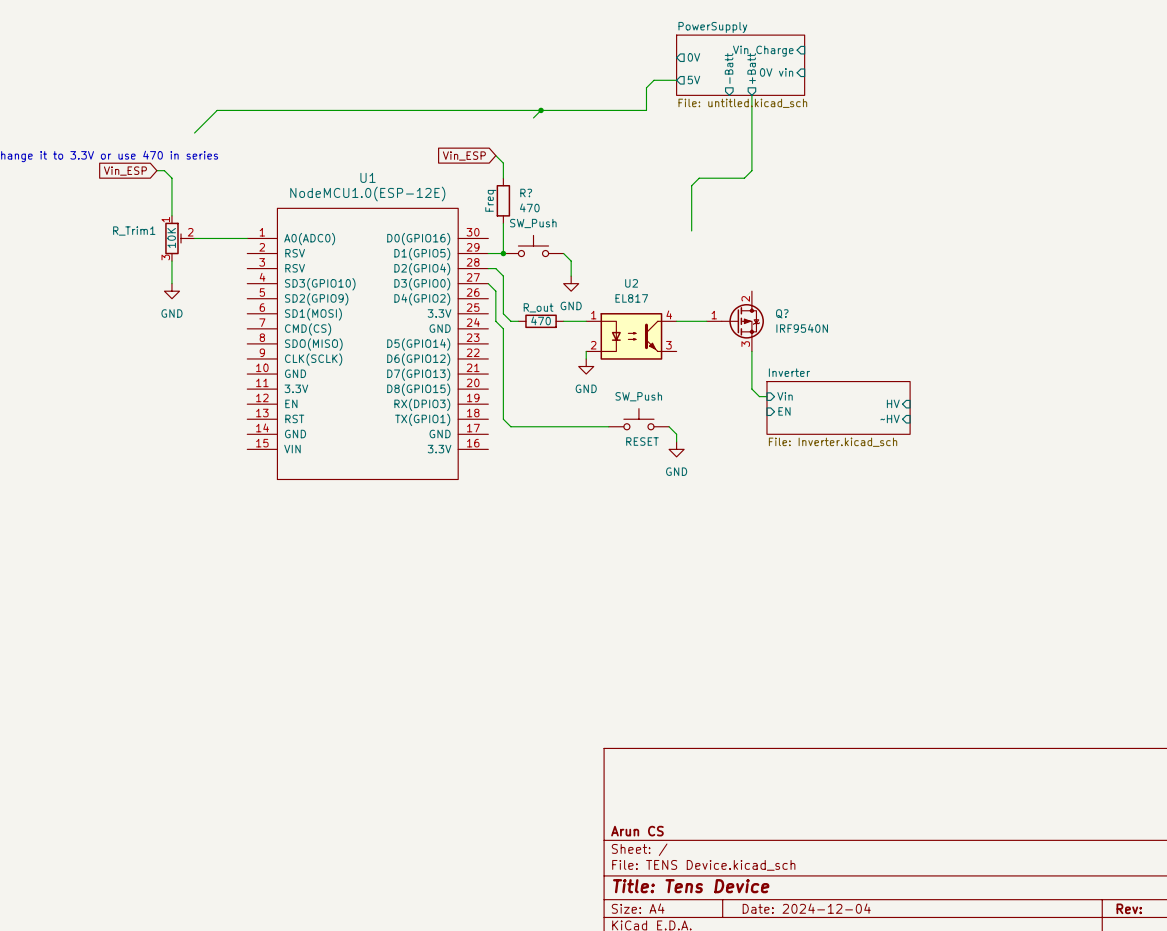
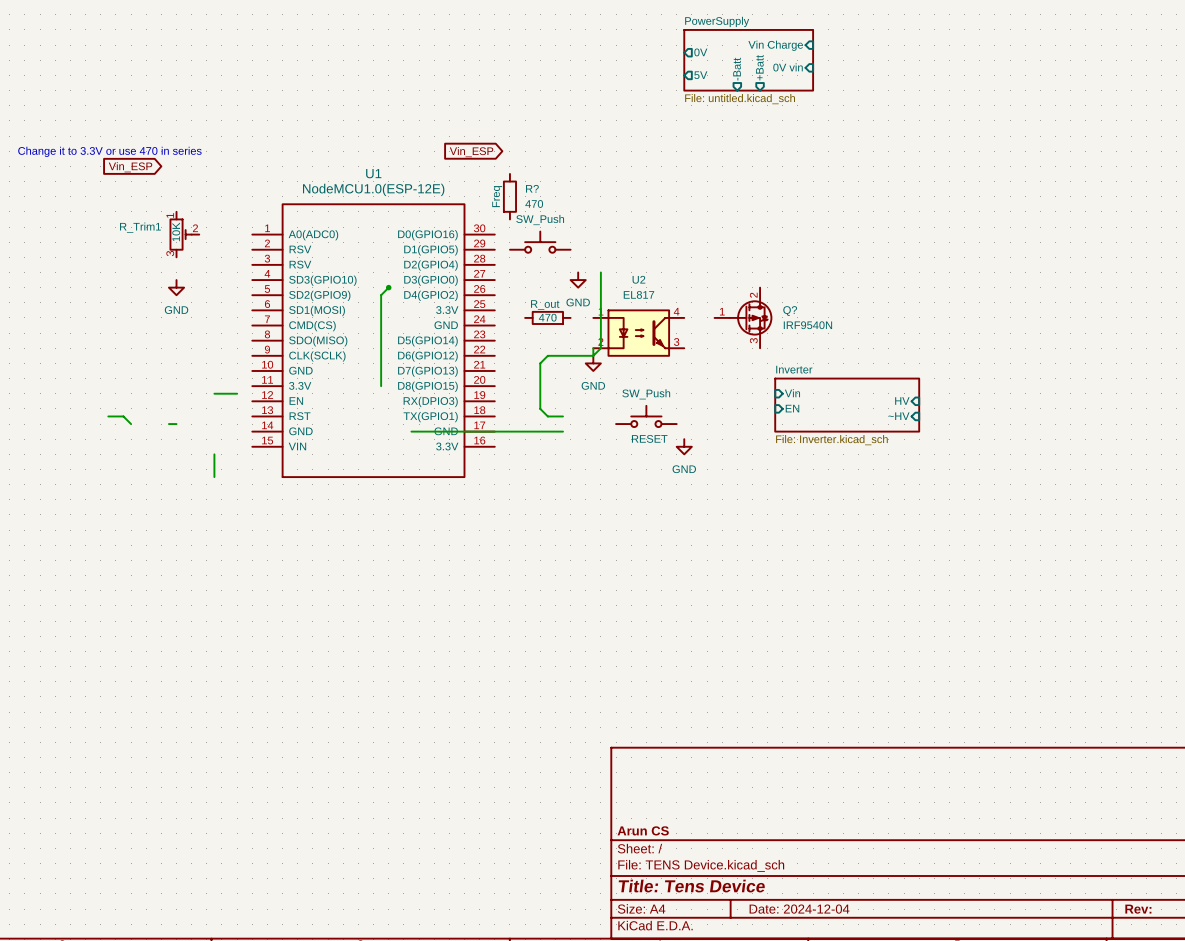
wire: (676, 80) (654, 80) (646, 87) (646, 110) (217, 110) (194, 133) -> none
wire: (751, 95) (751, 170) (744, 178) (699, 178) (691, 185) (691, 230) -> none
wire: (541, 110) (533, 117) -> none
junction: (541, 110) -> none
wire: (495, 155) (503, 163) (503, 178) -> none
wire: (156, 170) (164, 170) (171, 178) (171, 215) -> none
wire: (503, 223) (503, 253) (488, 253) -> none
wire: (194, 238) (247, 238) -> none
junction: (503, 253) -> none
wire: (563, 253) (571, 261) (571, 276) -> none
wire: (171, 261) (171, 283) -> none
wire: (488, 268) (495, 268) (503, 276) (503, 313) (510, 321) (518, 321) -> none
wire: none -> (600, 272) (600, 348) (593, 355) (547, 355) (540, 363) (540, 408) (547, 416) (563, 416)
wire: (488, 283) (495, 291) (495, 321) (503, 328) (503, 419) (510, 426) (608, 426) -> none
wire: none -> (388, 287) (381, 295) (381, 386)
junction: none -> (388, 287)
wire: (563, 321) (586, 321) -> none
wire: (676, 321) (706, 321) -> none
wire: (751, 351) (751, 389) (759, 396) (766, 396) -> none
wire: none -> (214, 393) (237, 393)
wire: none -> (108, 416) (123, 416) (131, 424)
wire: none -> (168, 424) (176, 424)
wire: (669, 426) (676, 434) (676, 441) -> none
wire: none -> (411, 431) (563, 431)
wire: none -> (214, 454) (214, 477)

